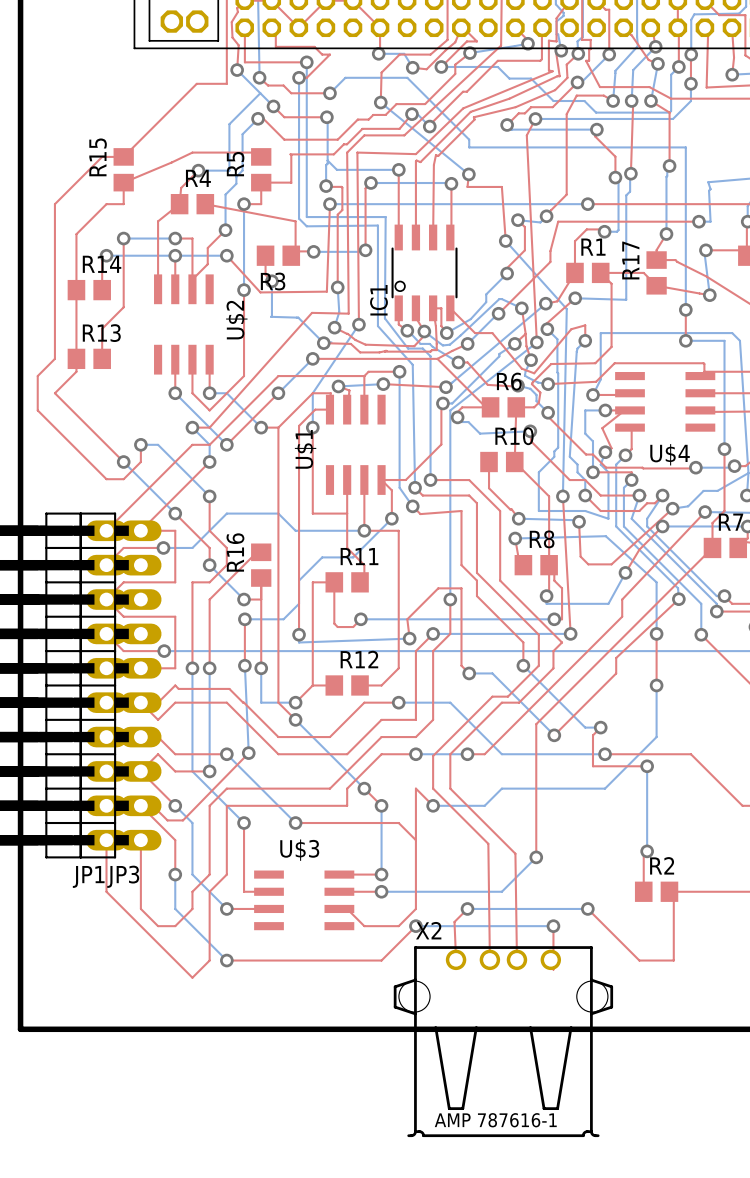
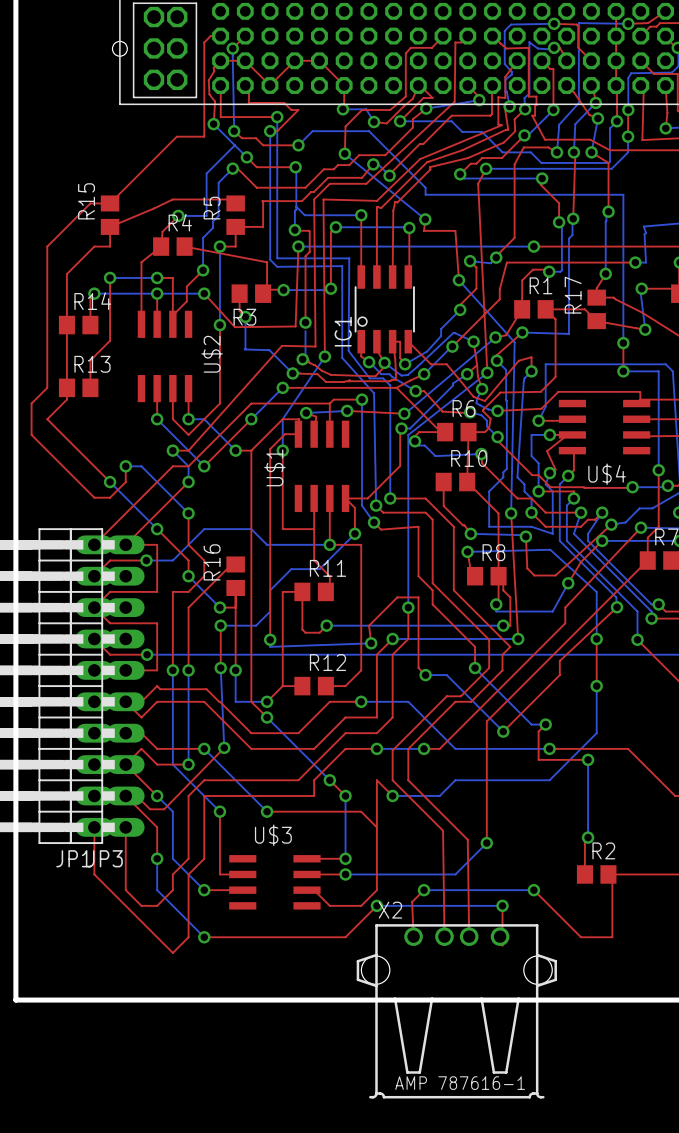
bottom track: (337, 287) (339, 312) (334, 327) -> none
bottom track: none -> (305, 331) (305, 358) (309, 362) (308, 359)

